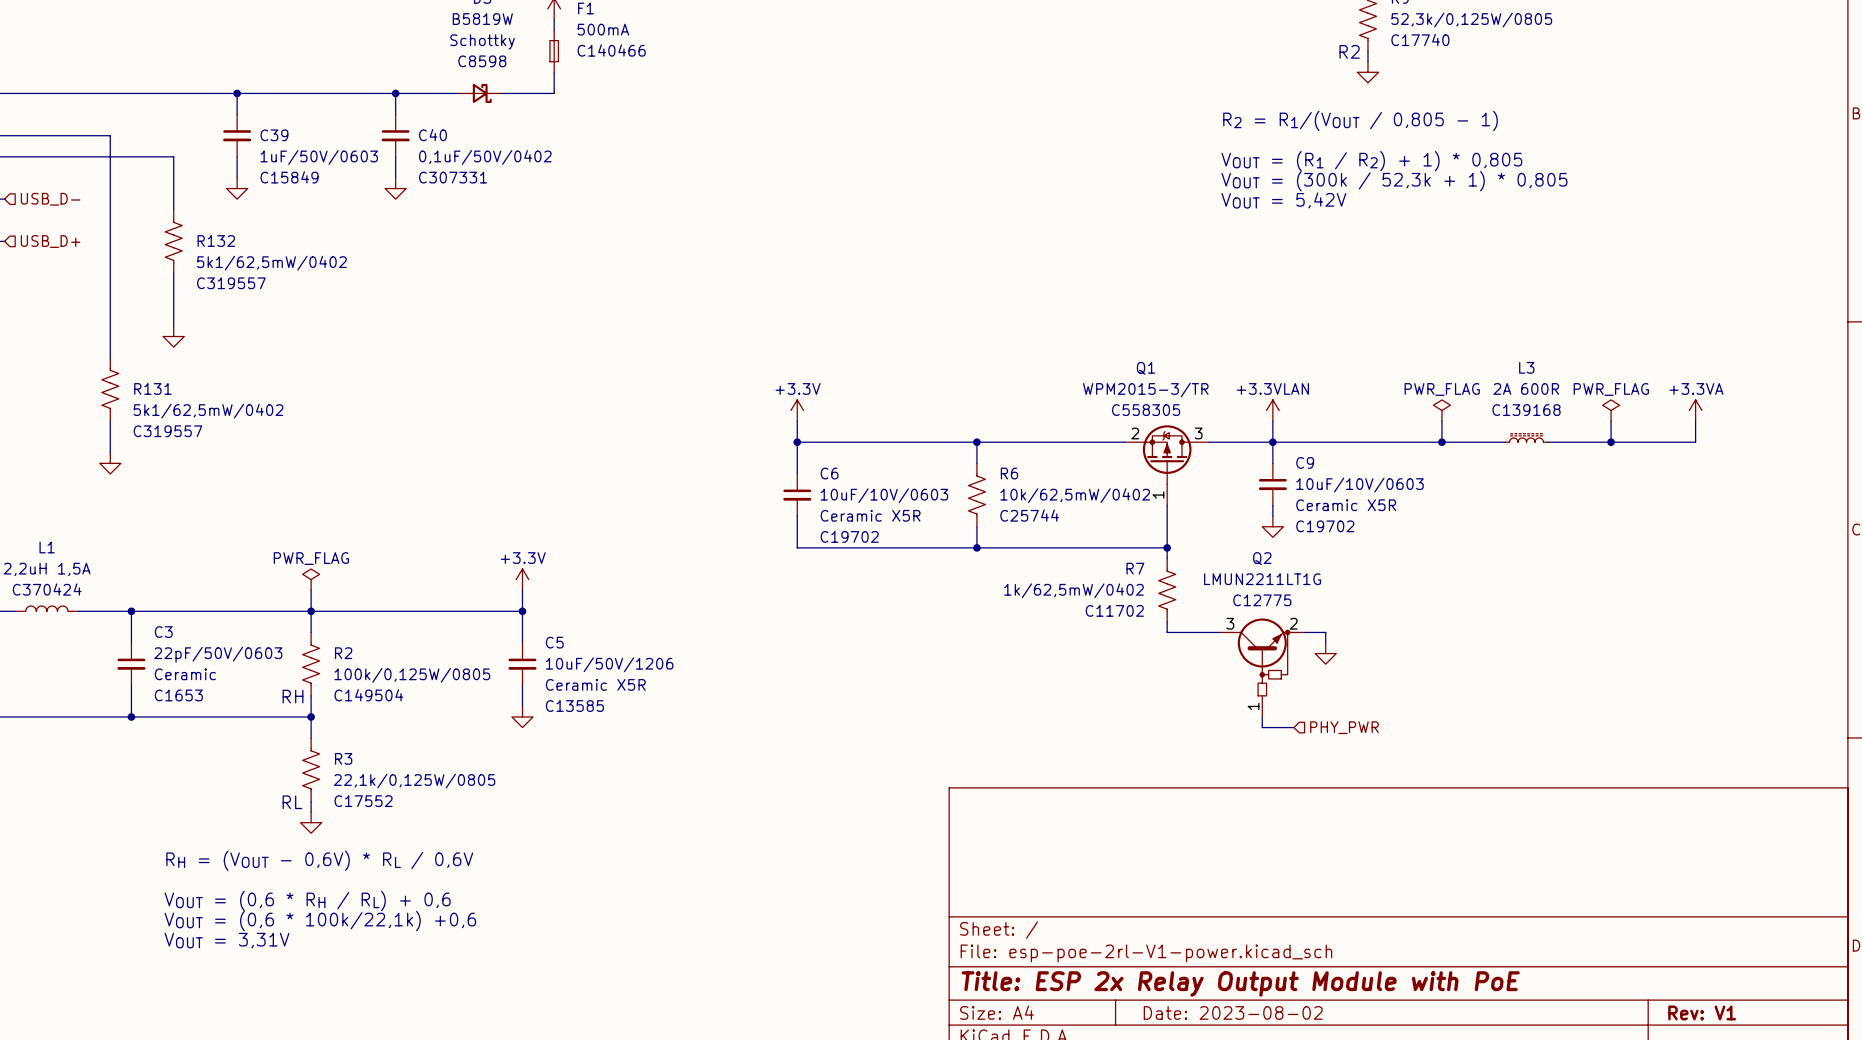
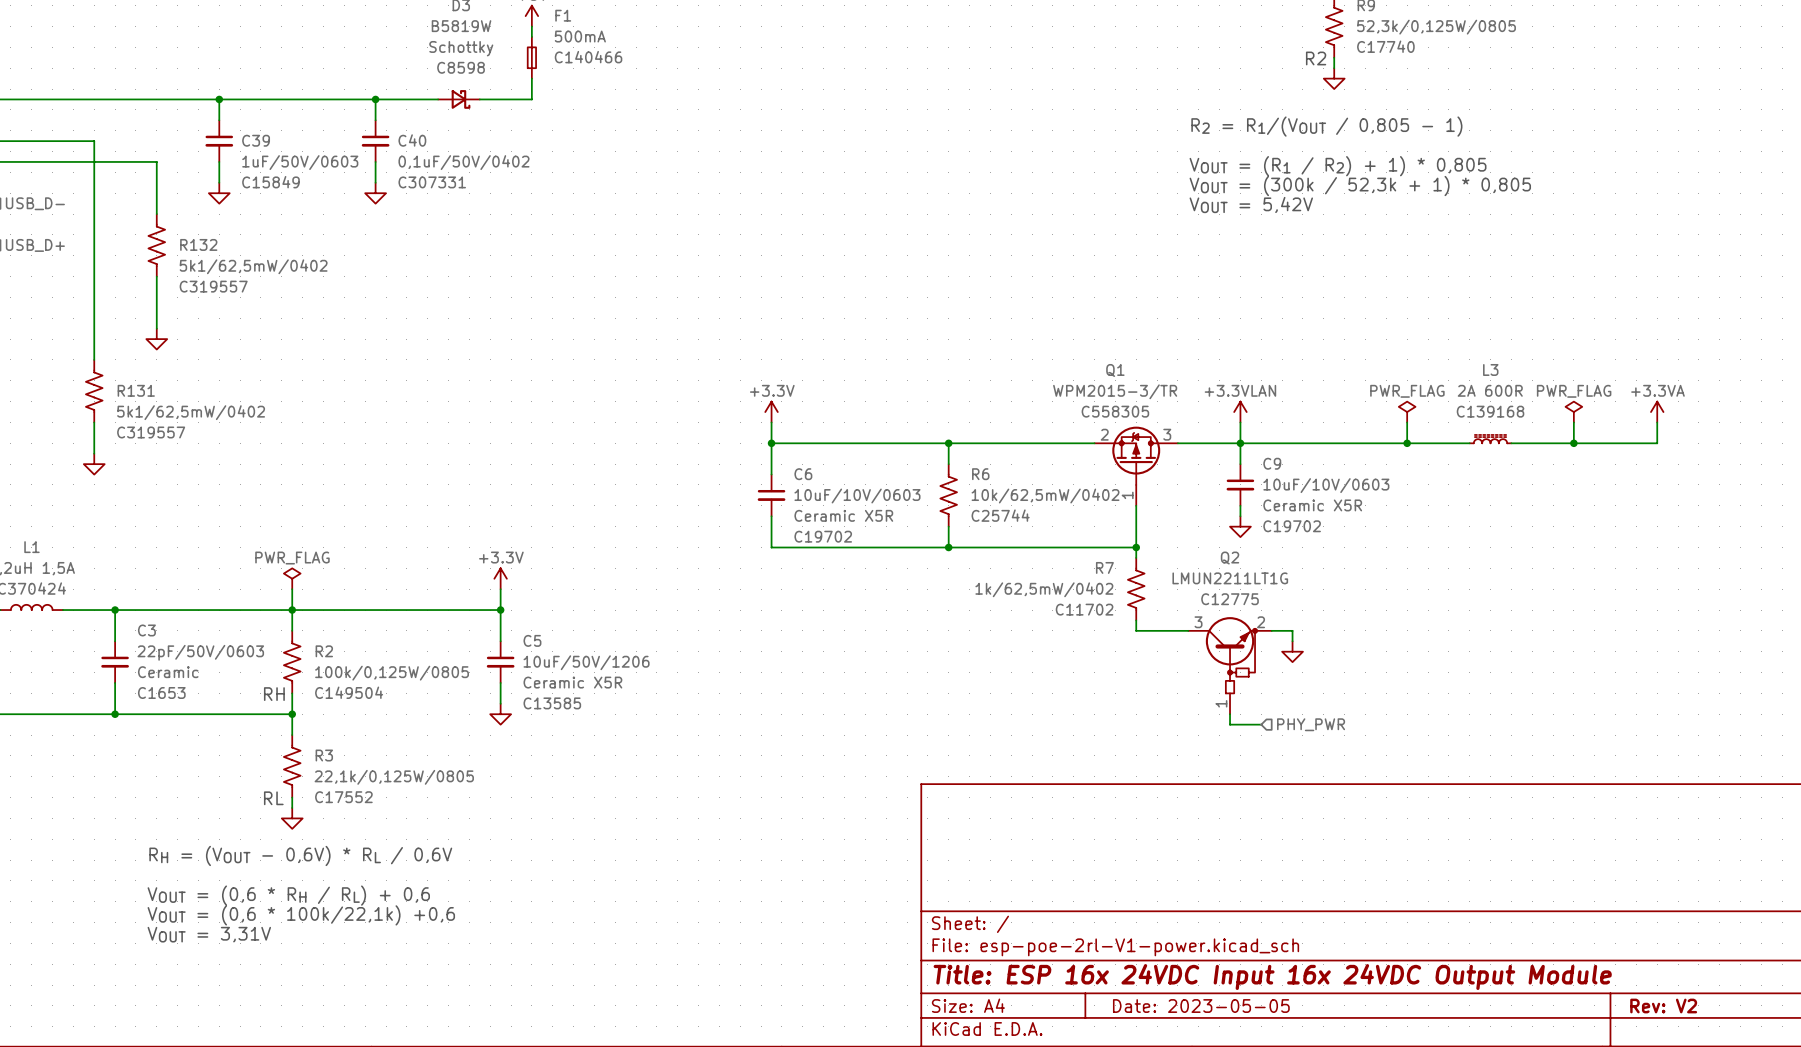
title block: Title: ESP 2x Relay Output Module with PoE (1240, 983) -> Title: ESP 16x 24VDC Input 16x 24VDC Output Module (1272, 977)
title block: Date: 2023-08-02 (1233, 1012) -> Date: 2023-05-05 (1201, 1006)
title block: Rev: V1 (1702, 1012) -> Rev: V2 (1663, 1006)

